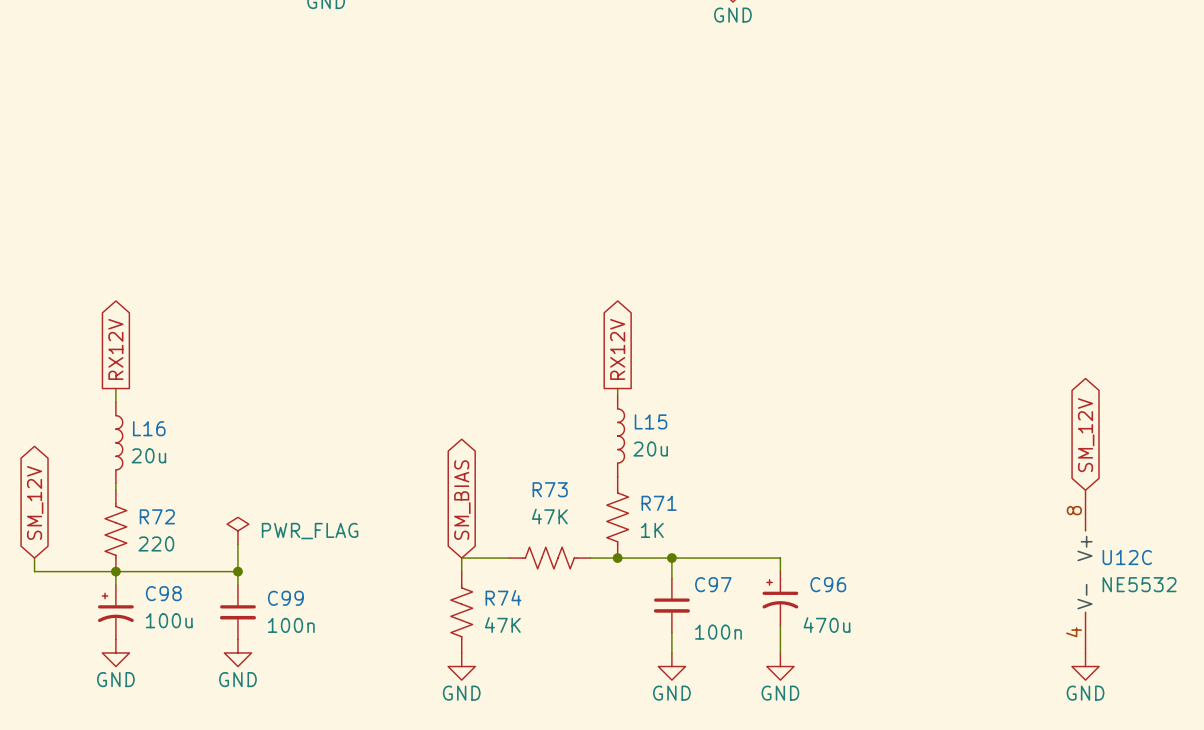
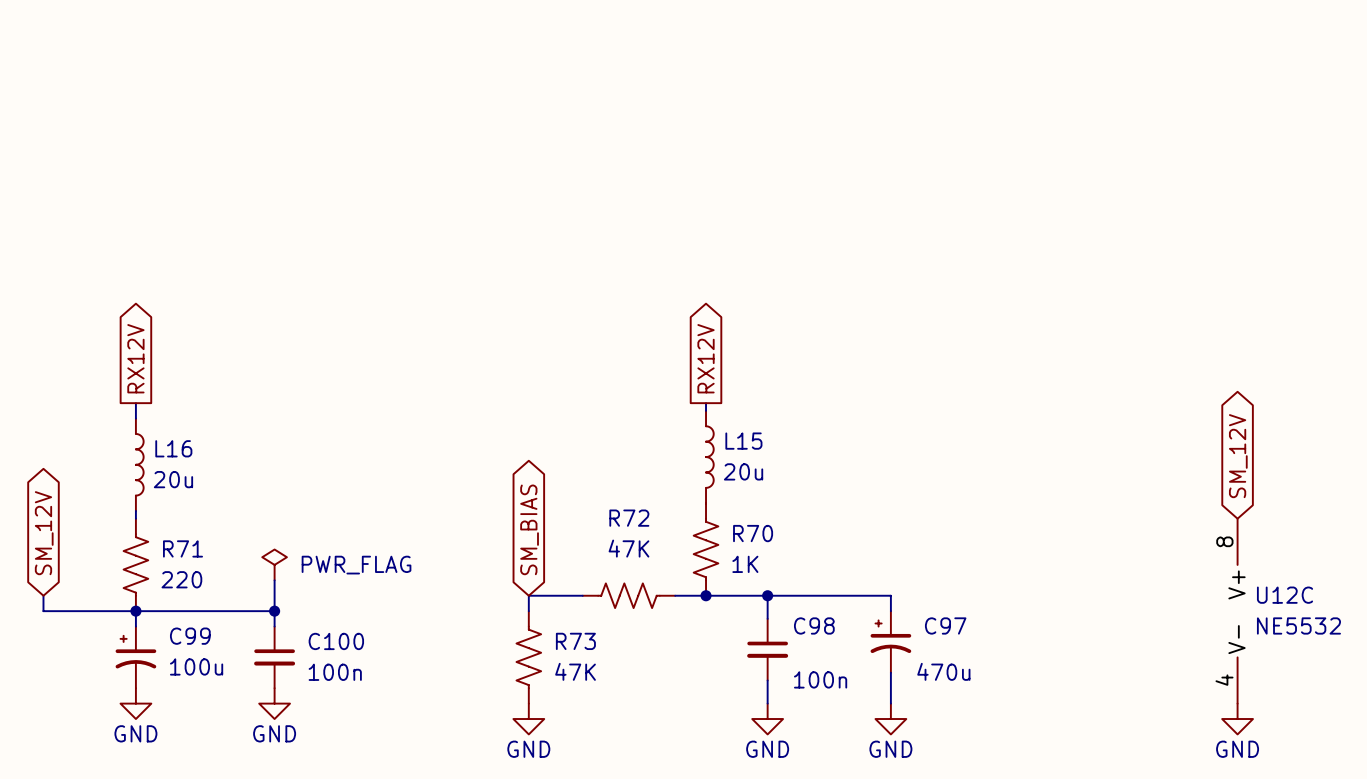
R73 name: R73 (550, 489) -> R72 (629, 518)
R71 name: R71 (659, 503) -> R70 (753, 533)
R72 name: R72 (157, 516) -> R71 (183, 548)
C97 name: C97 (713, 584) -> C98 (814, 625)
C96 name: C96 (828, 584) -> C97 (945, 625)
C98 name: C98 (163, 593) -> C99 (190, 636)
R74 name: R74 (503, 597) -> R73 (575, 641)
C99 name: C99 (285, 598) -> C100 (336, 641)

